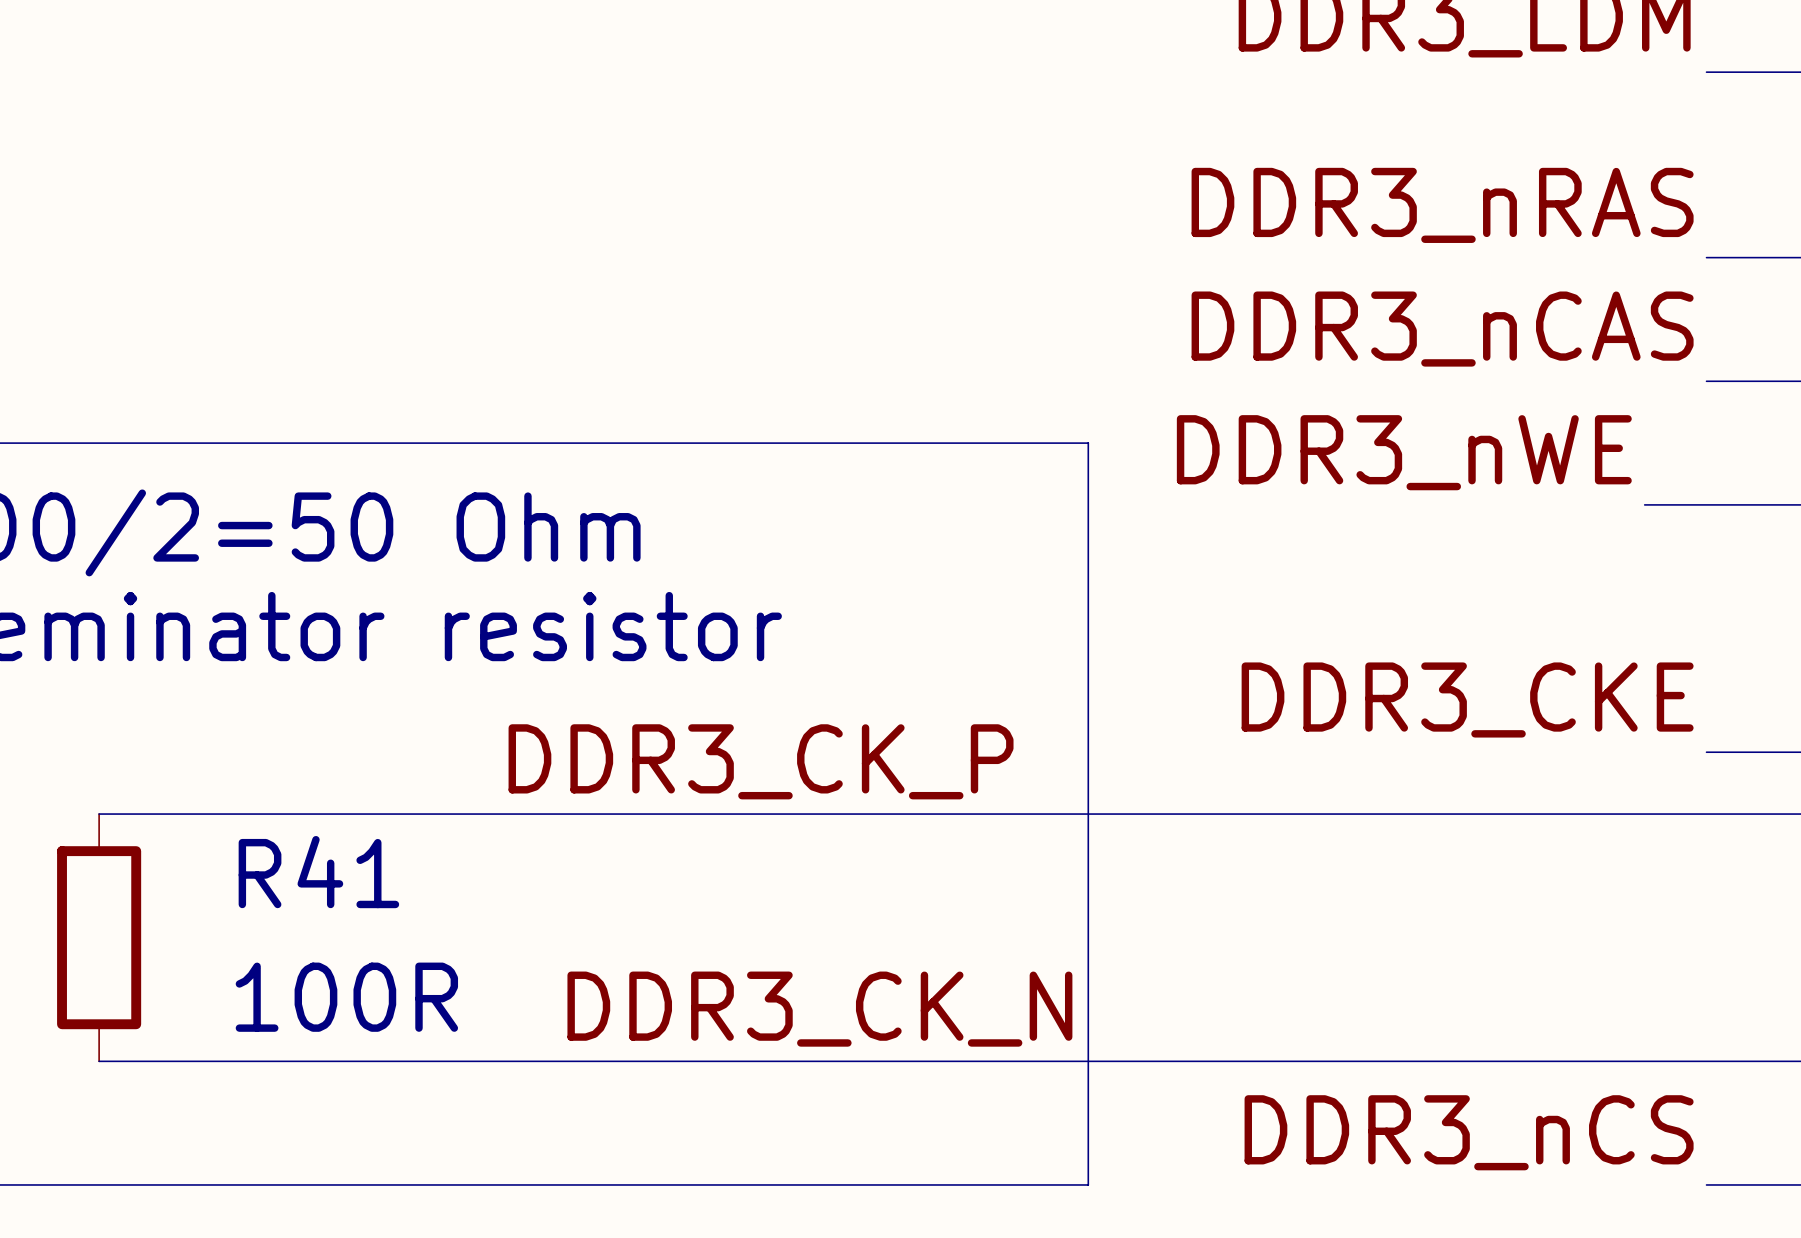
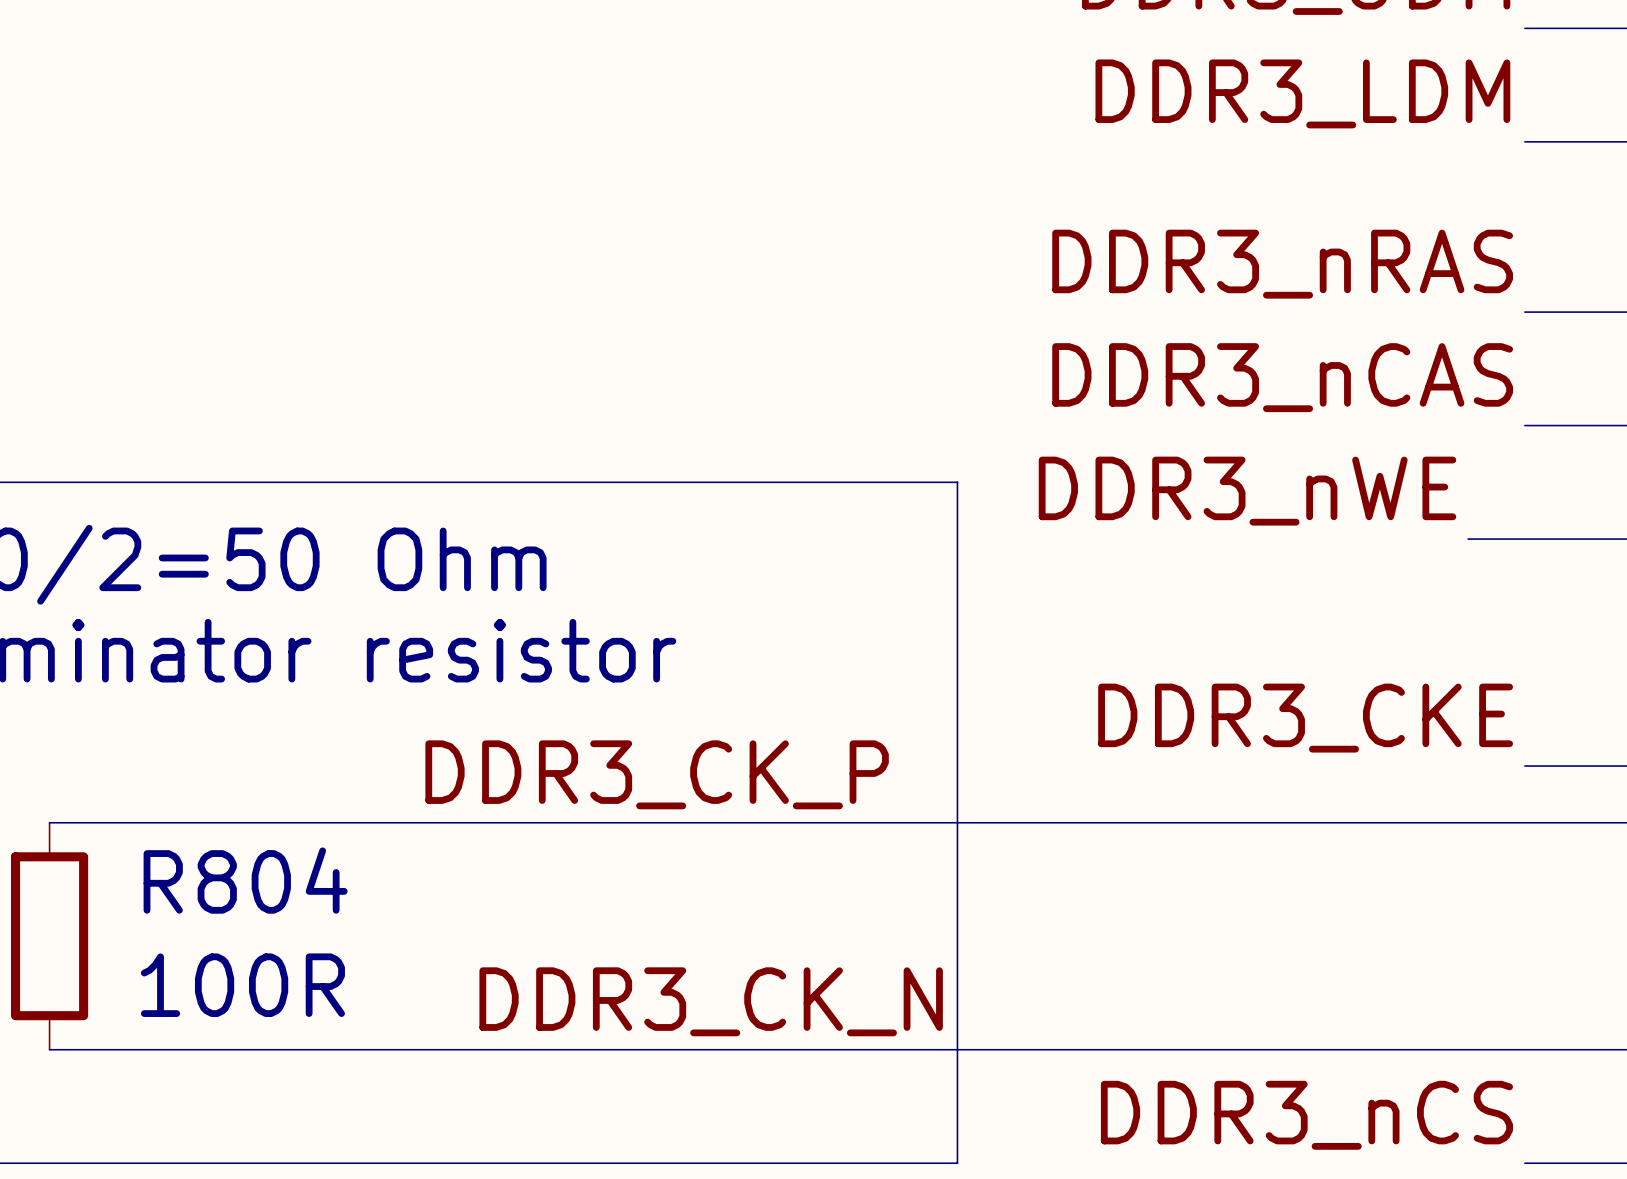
R41 name: R41 (318, 872) -> R804 (245, 880)
R41 value position: 100R (346, 997) -> 100R (242, 985)

